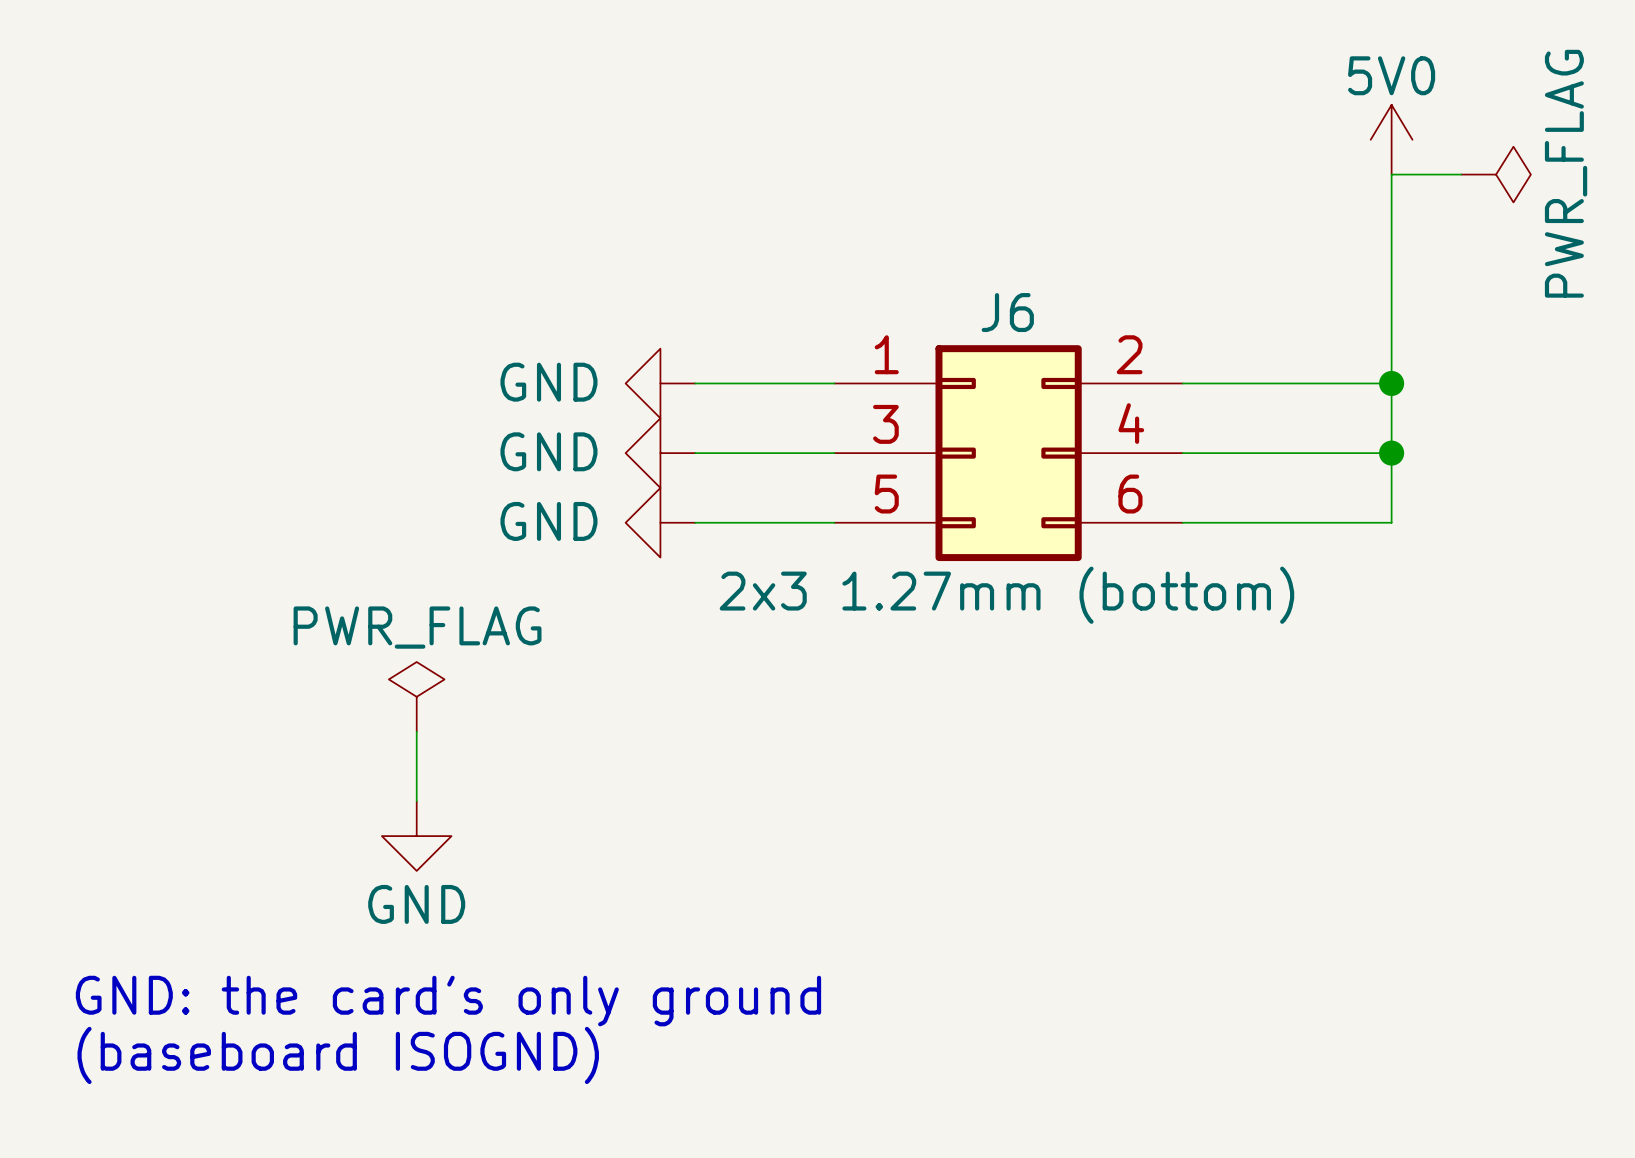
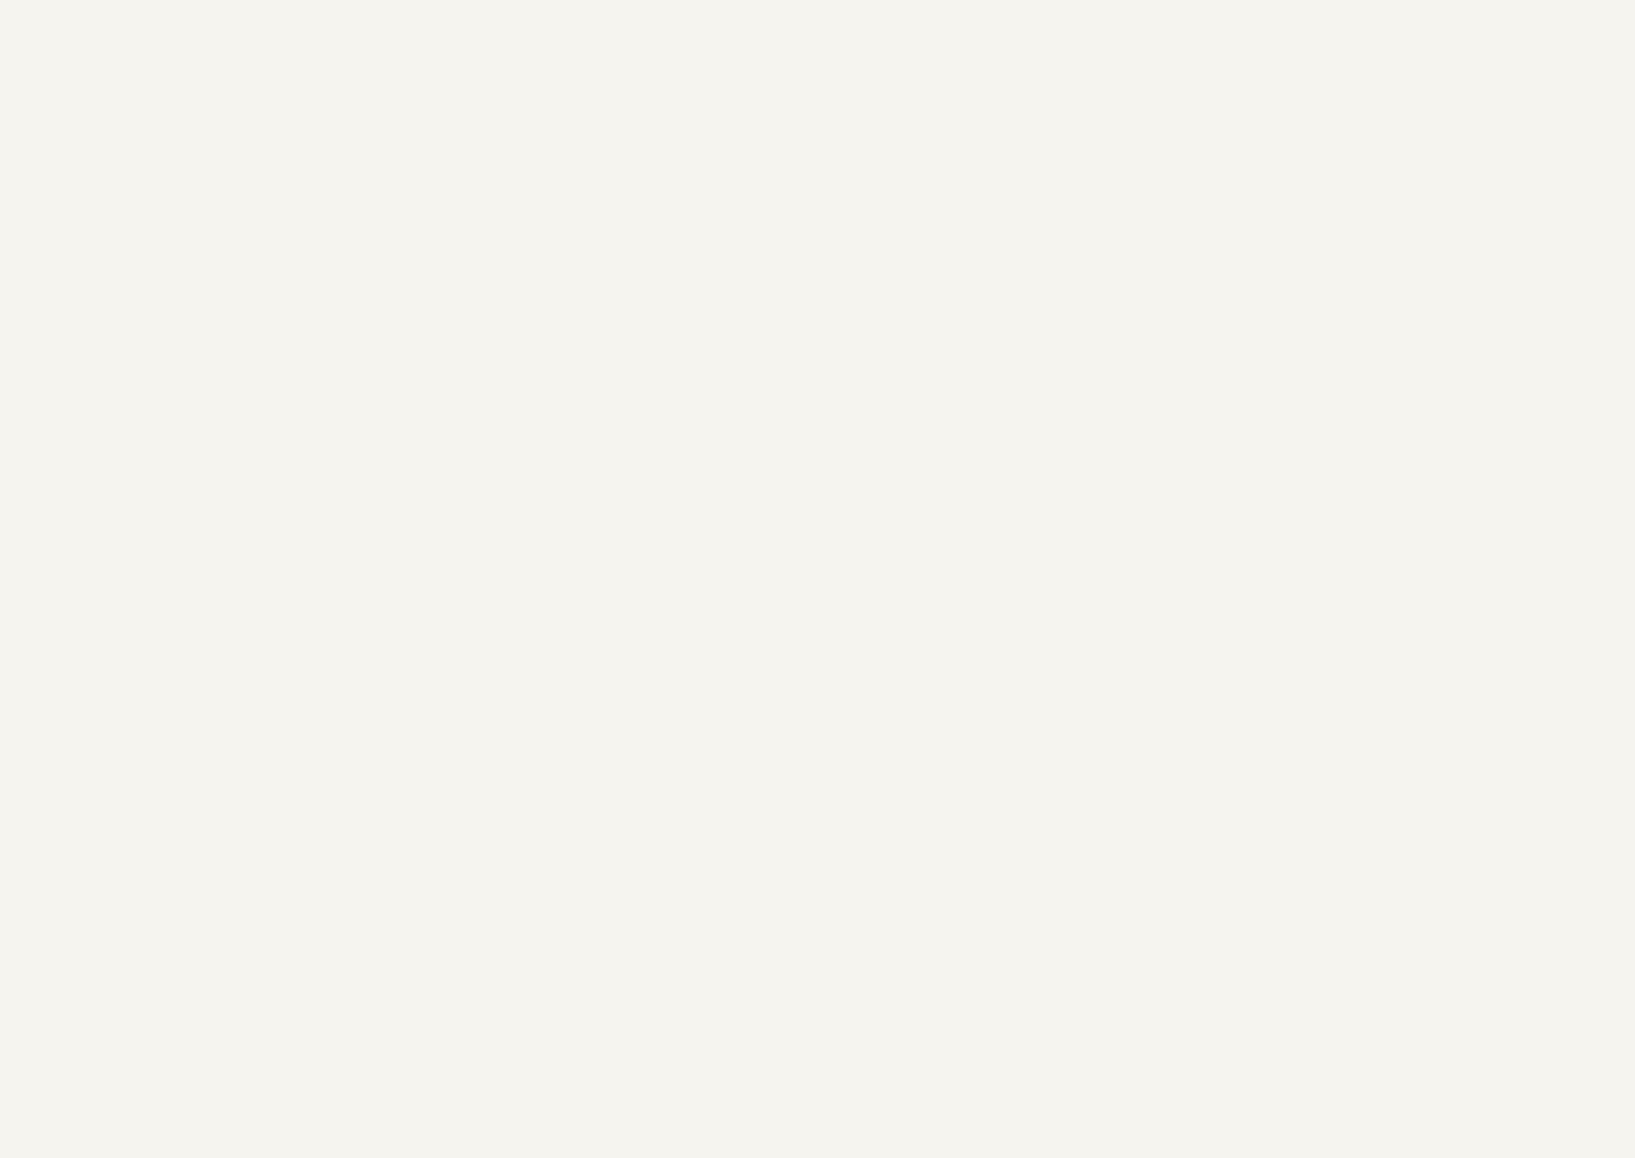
power symbol: 5V0 (1391, 139) -> none
wire: (1461, 174) (1391, 174) (1391, 522) (1182, 522) -> none
power symbol: PWR_FLAG (1496, 174) -> none
power symbol: GND (660, 383) -> none
wire: (695, 383) (834, 383) -> none
wire: (1182, 383) (1391, 383) -> none
junction: (1391, 383) -> none
power symbol: GND (660, 453) -> none
wire: (695, 453) (834, 453) -> none
J6: 2x3 1.27mm (bottom) (1008, 453) -> none
wire: (1182, 453) (1391, 453) -> none
junction: (1391, 453) -> none
power symbol: GND (660, 522) -> none
wire: (695, 522) (834, 522) -> none
power symbol: PWR_FLAG (416, 696) -> none
wire: (416, 731) (416, 801) -> none
power symbol: GND (416, 836) -> none
text: GND: the card's only ground (448, 1001) -> none
text: (baseboard ISOGND) (338, 1055) -> none

